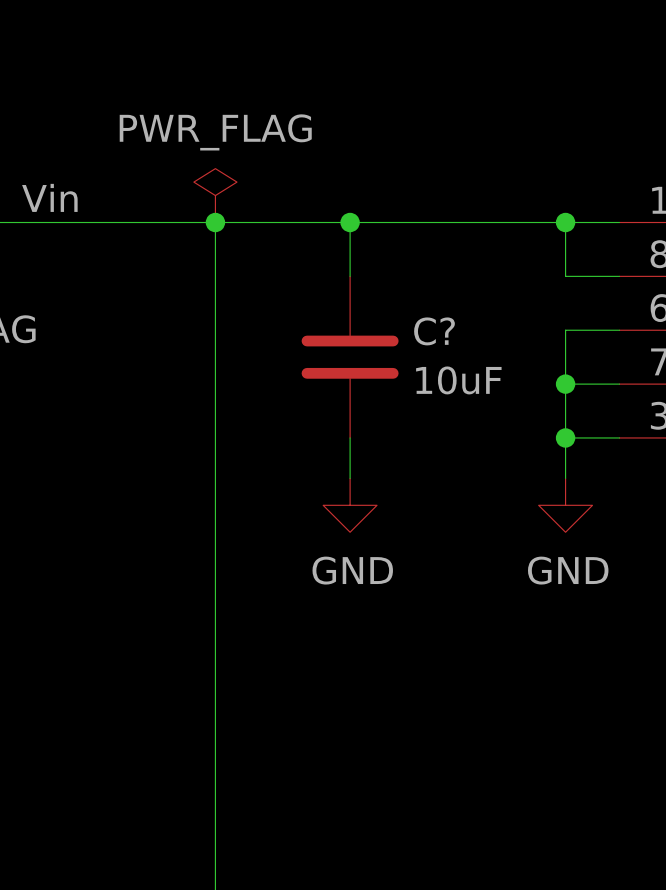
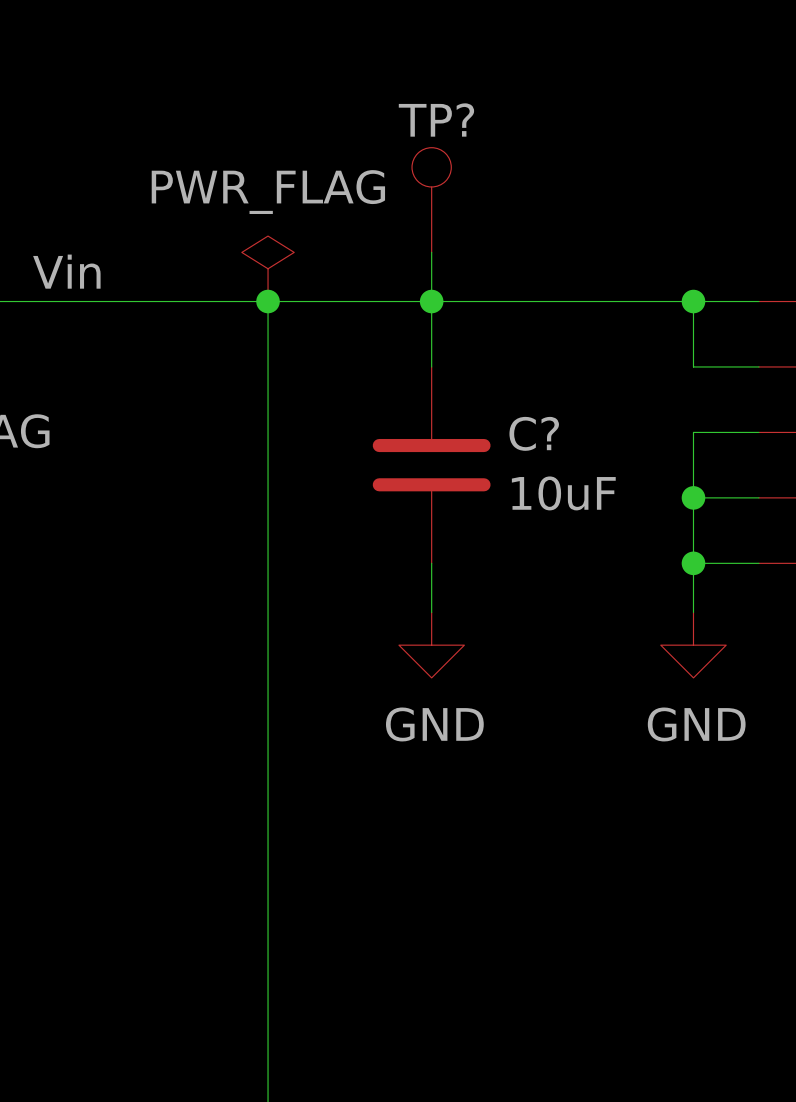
TP?: none -> (431, 200)
wire: none -> (431, 252) (431, 301)

